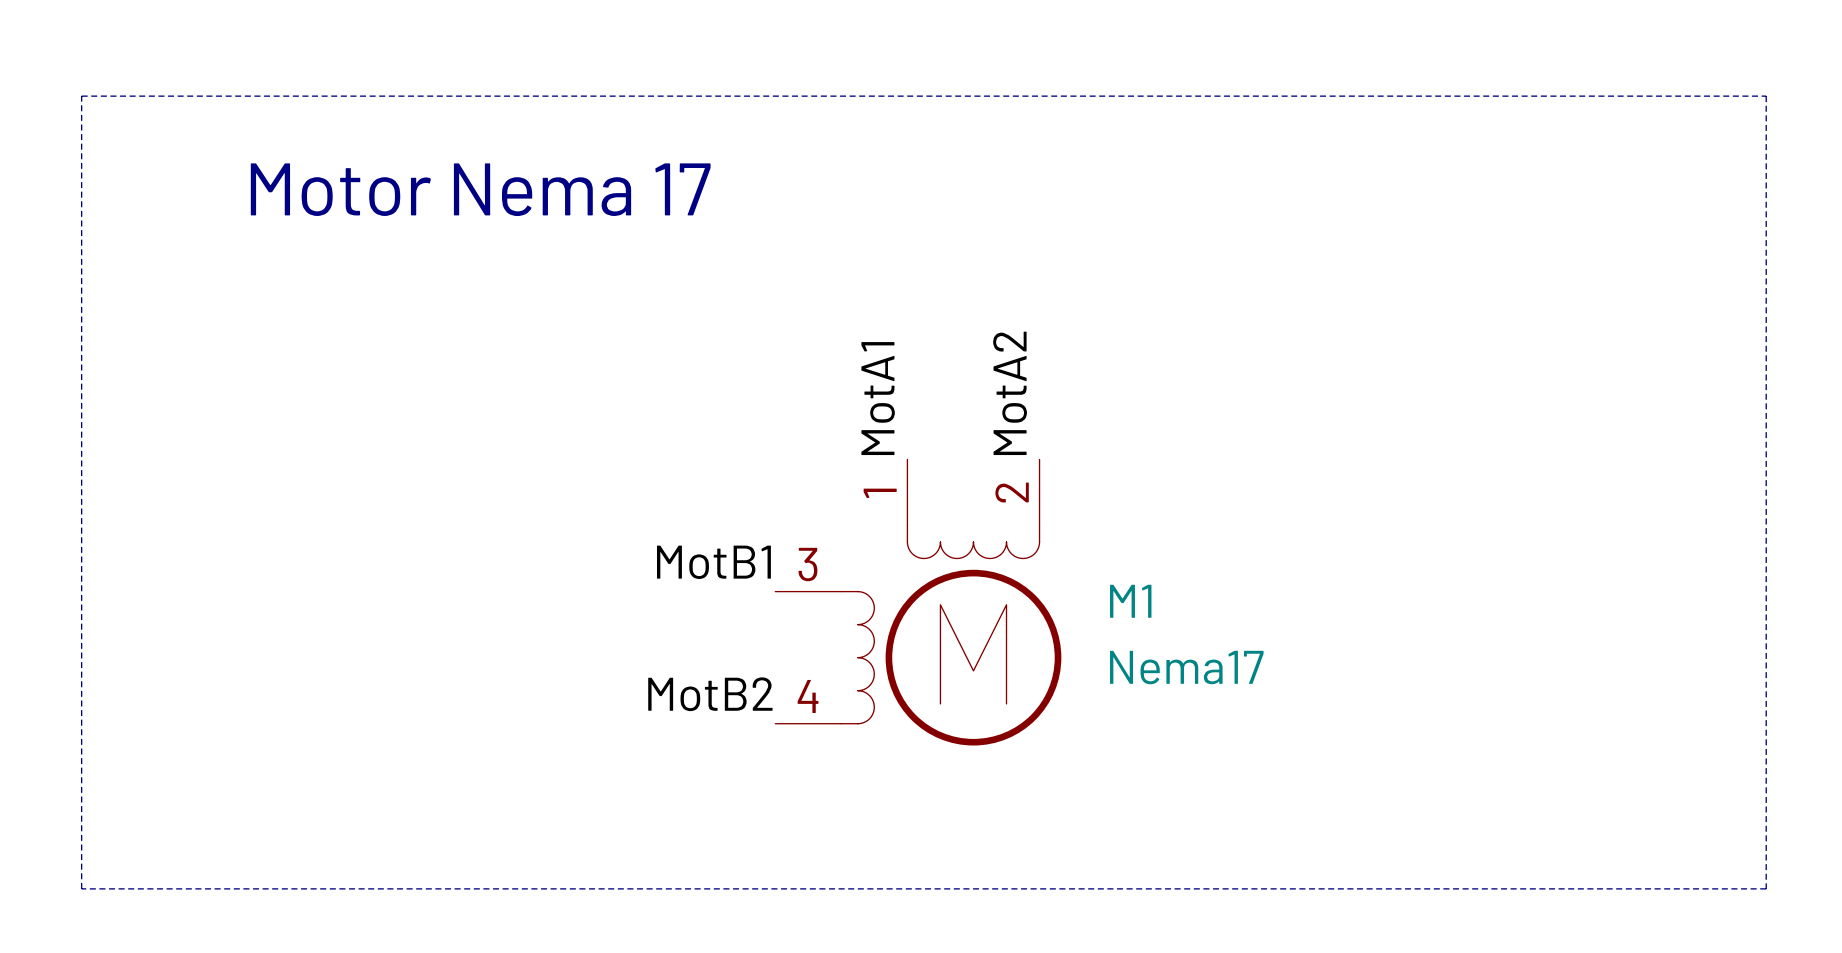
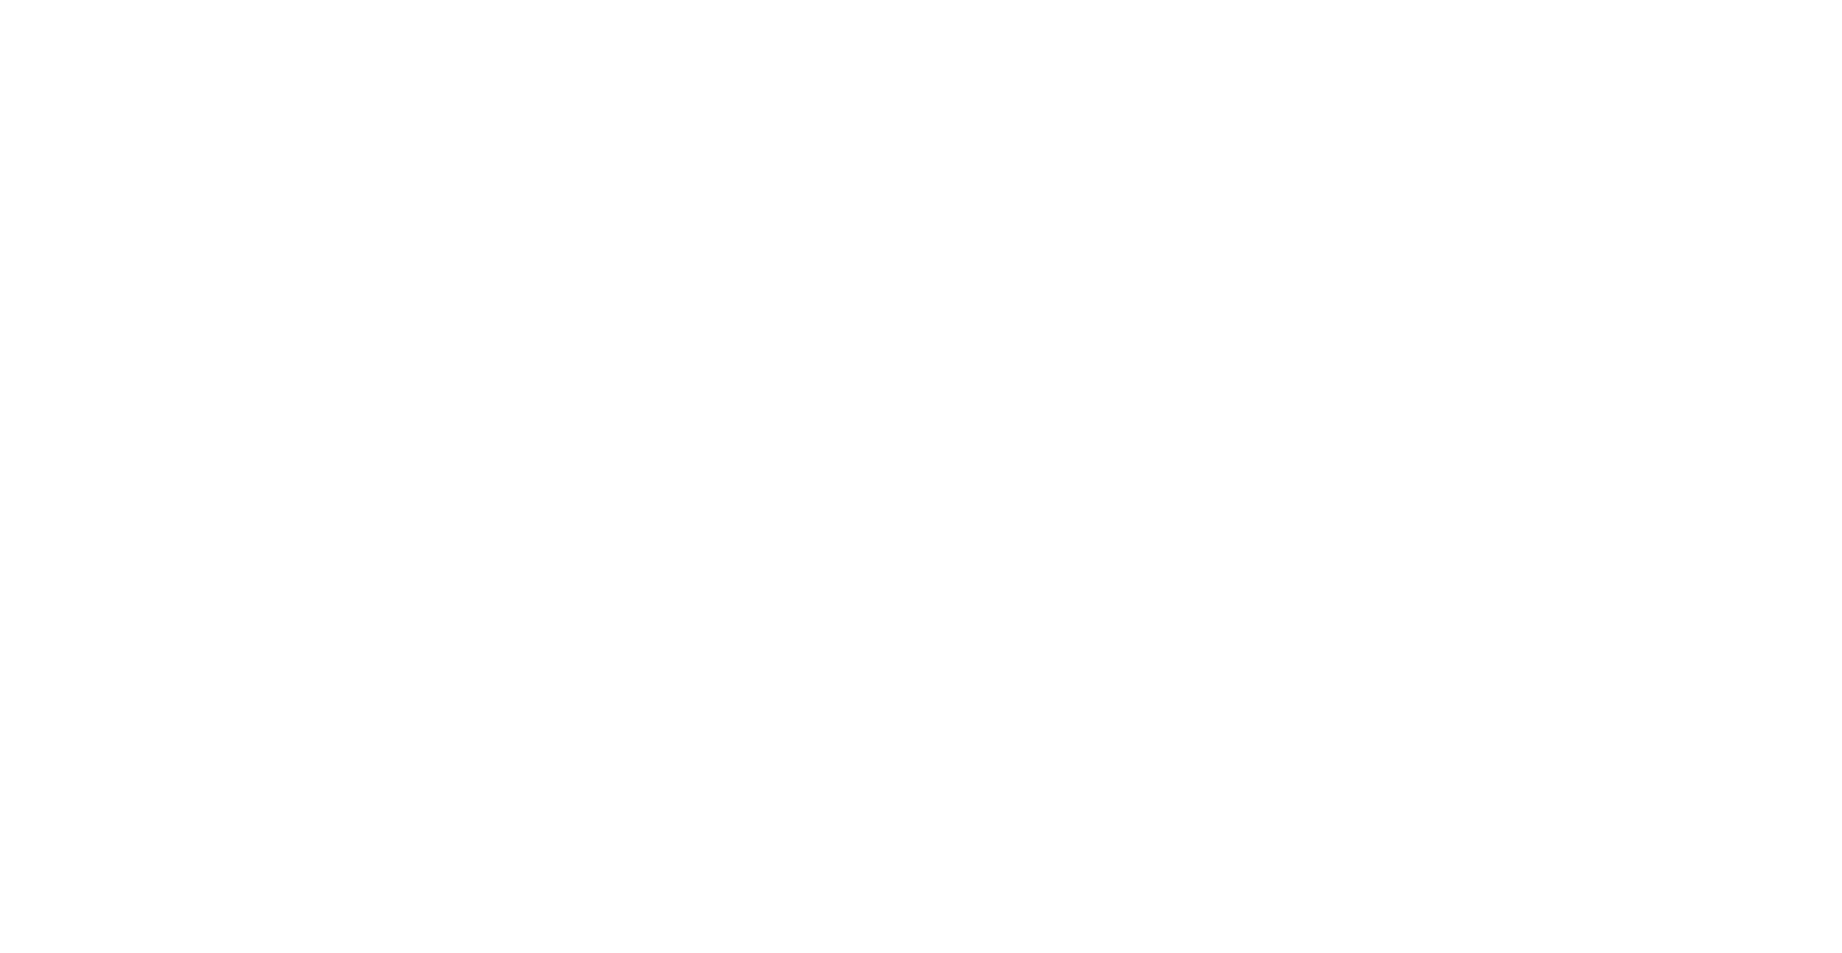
line: (81, 96) (1766, 96) (1766, 888) (81, 888) (81, 96) -> none
text: Motor Nema 17 (480, 189) -> none
label: MotA2 (1010, 393) -> none
label: MotA1 (878, 398) -> none
label: MotB1 (713, 562) -> none
M1: Nema17 (918, 602) -> none
label: MotB2 (710, 694) -> none

